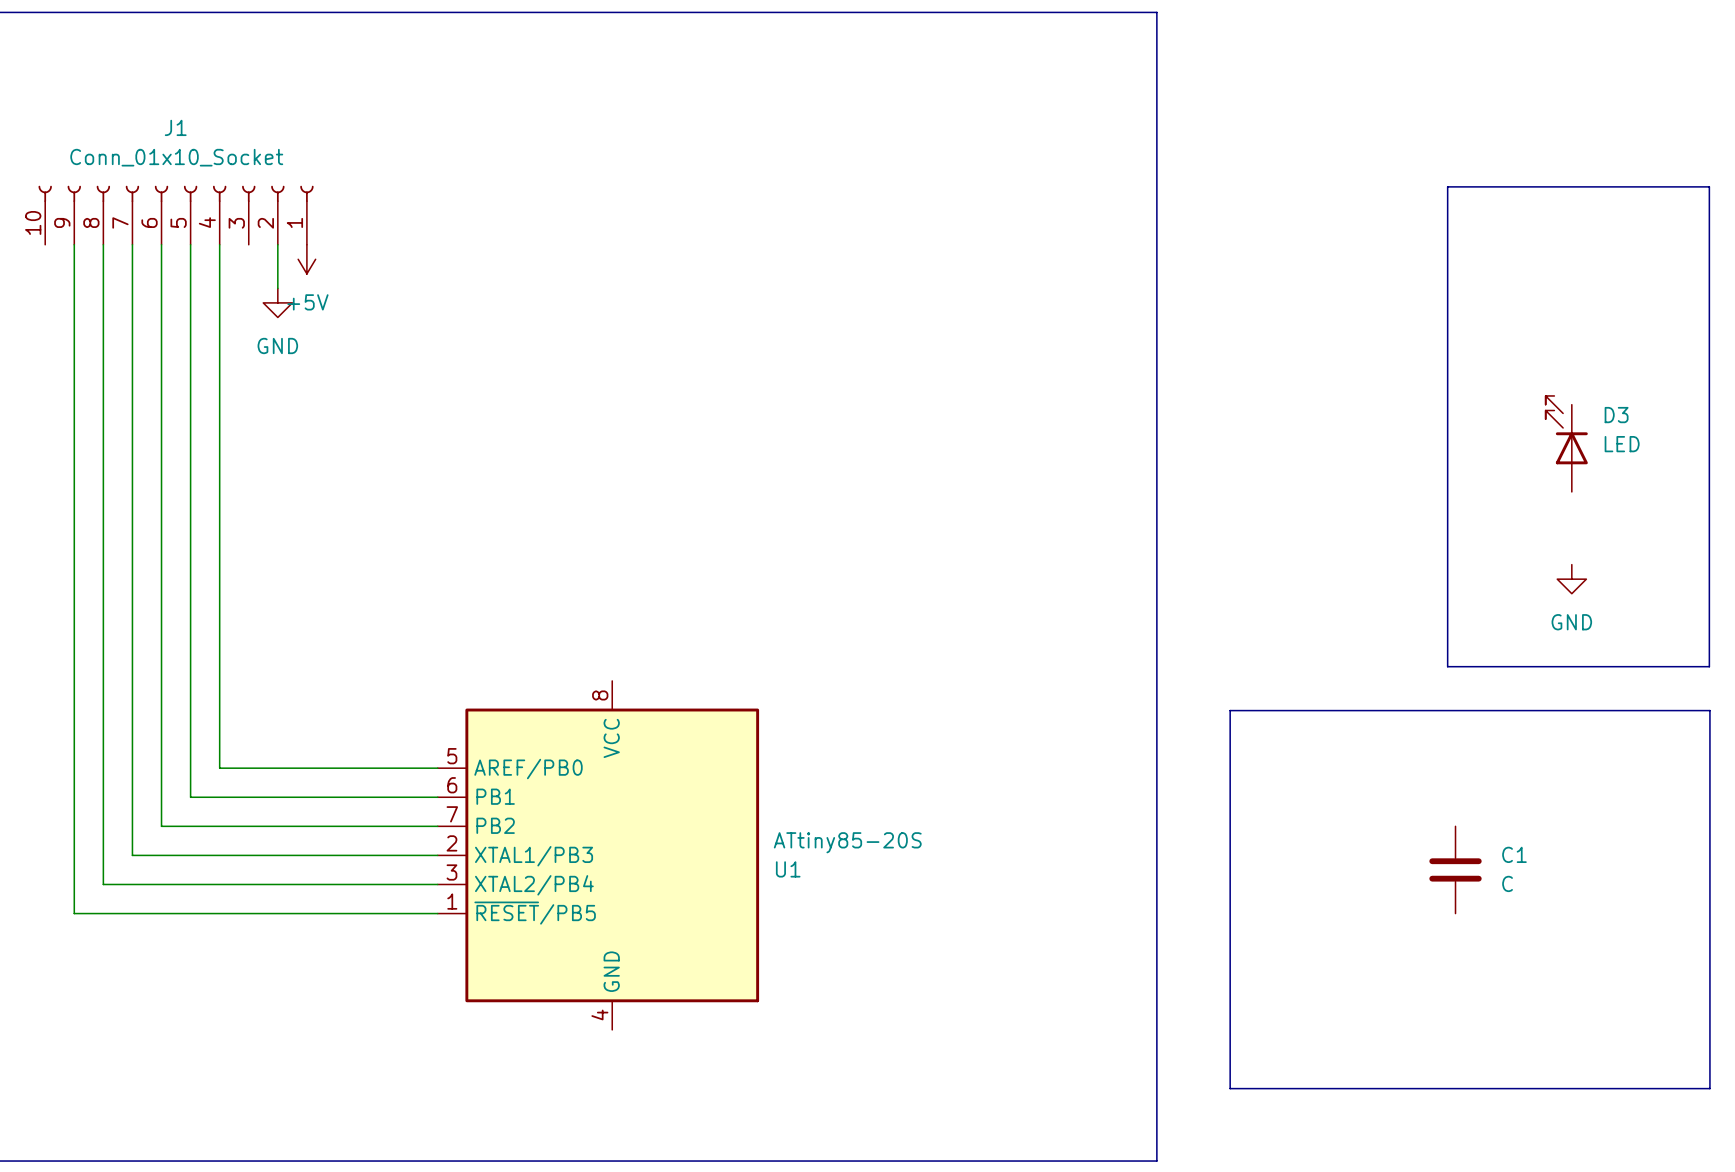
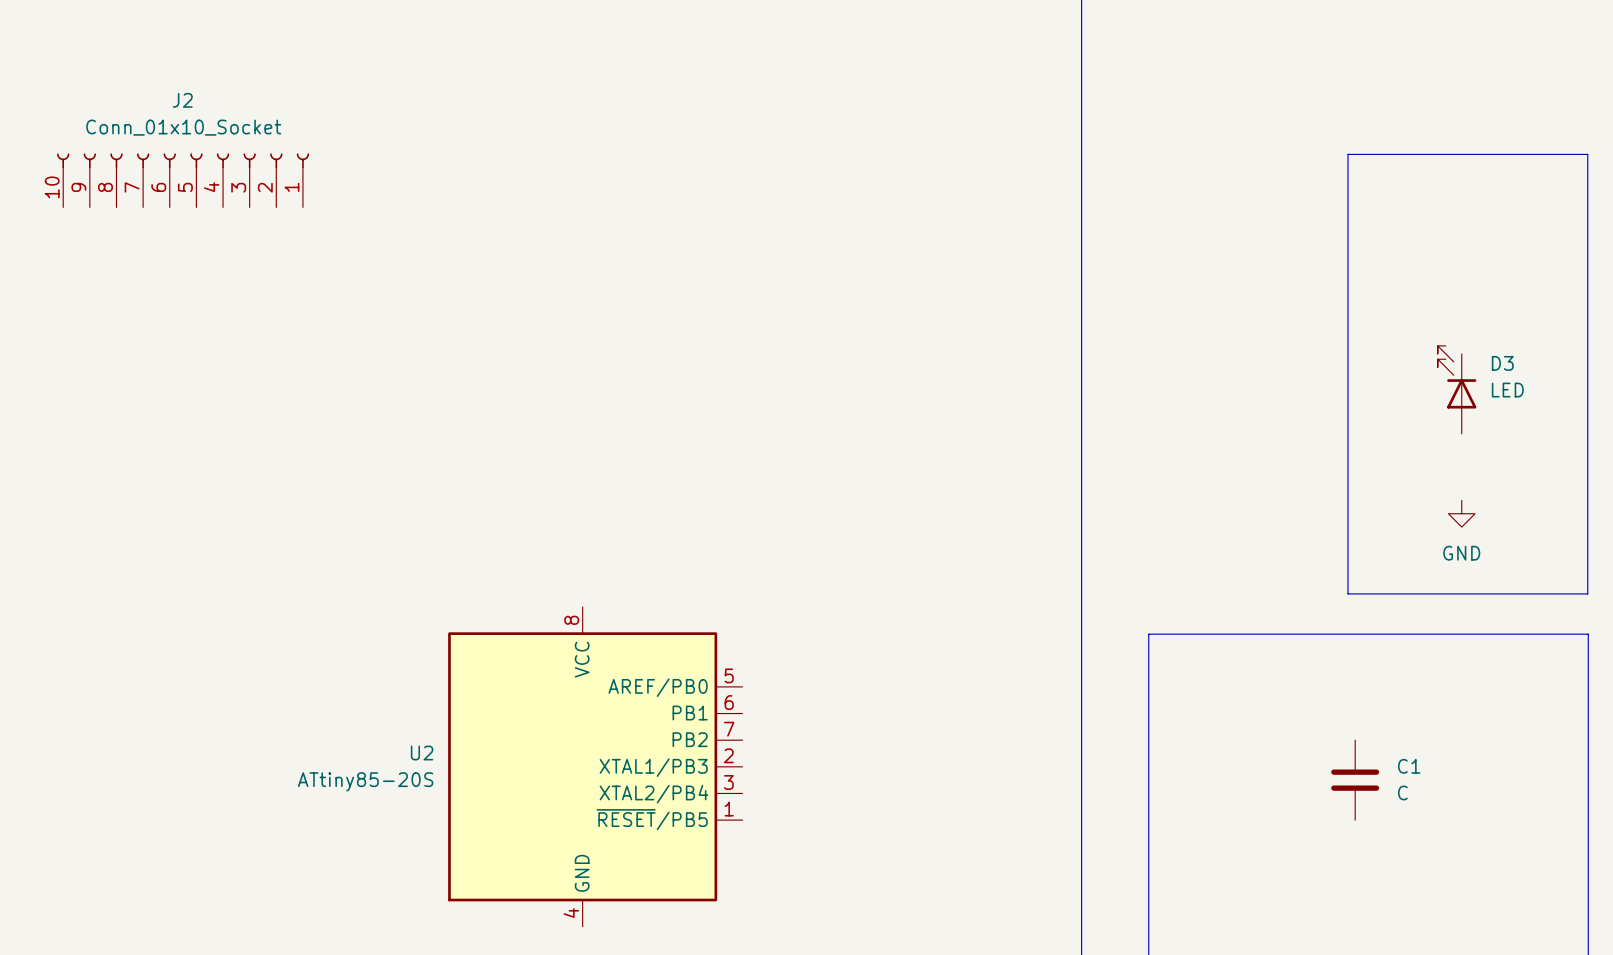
J1 name: J1 (175, 127) -> J2 (182, 100)
wire: (74, 244) (74, 913) (437, 913) -> none
wire: (103, 244) (103, 884) (437, 884) -> none
wire: (132, 244) (132, 855) (437, 855) -> none
wire: (161, 244) (161, 826) (437, 826) -> none
wire: (190, 244) (190, 797) (437, 797) -> none
wire: (219, 244) (219, 768) (437, 768) -> none
wire: (277, 244) (277, 288) -> none
power symbol: +5V (306, 259) -> none
power symbol: GND (277, 302) -> none
U1: ATtiny85-20S (598, 855) -> none
U2: none -> ATtiny85-20S (595, 766)

